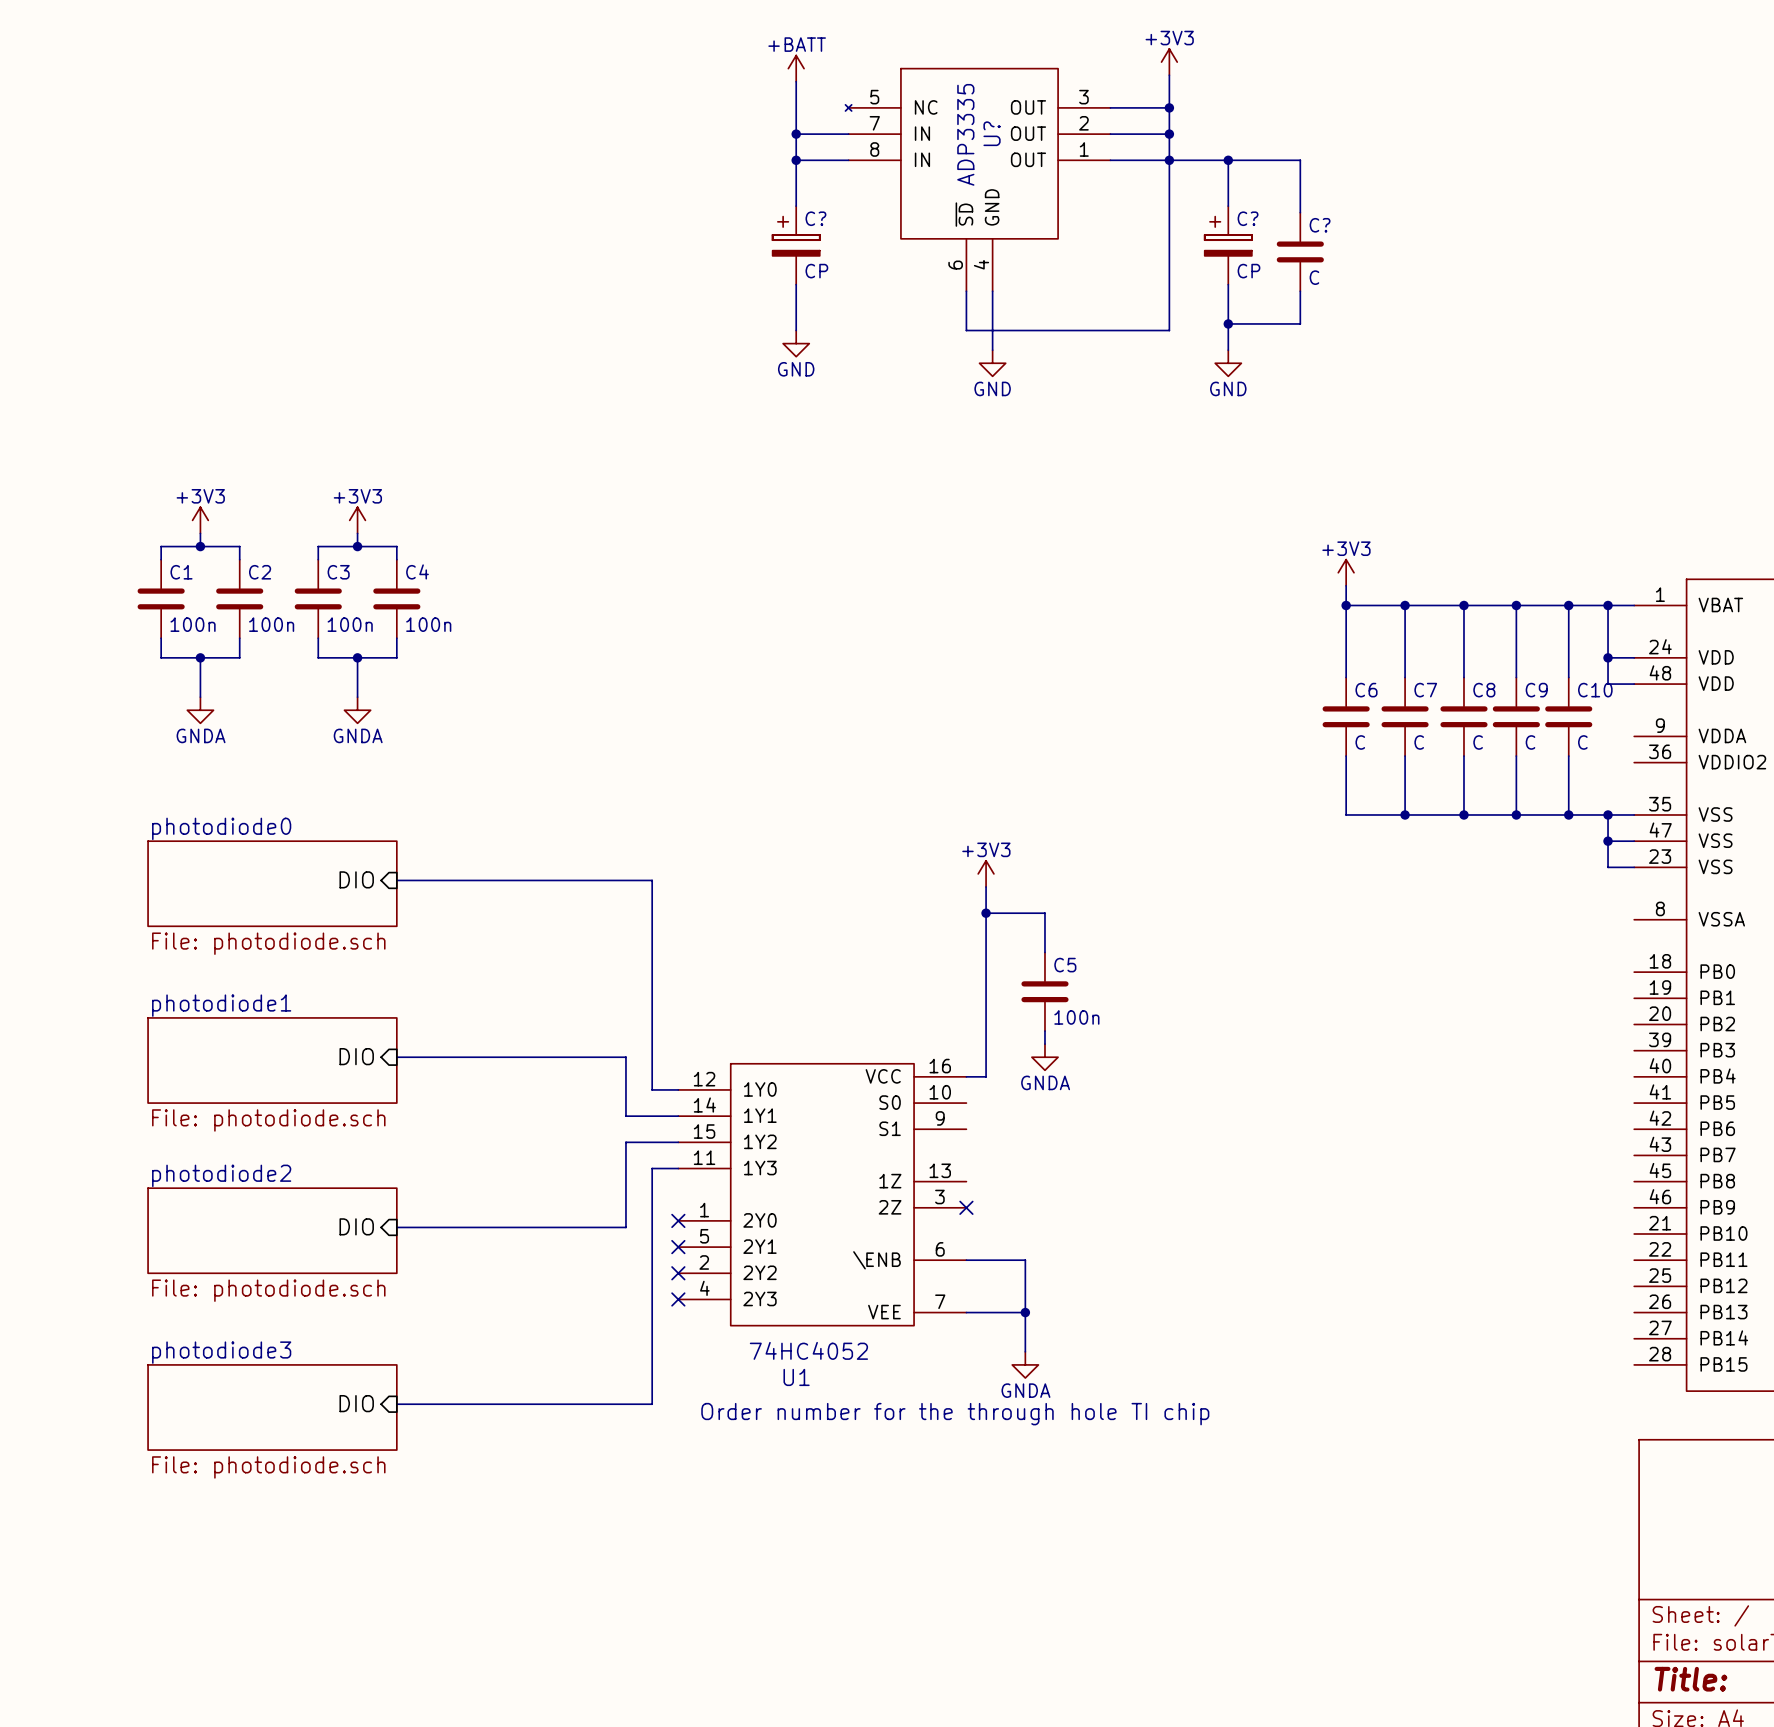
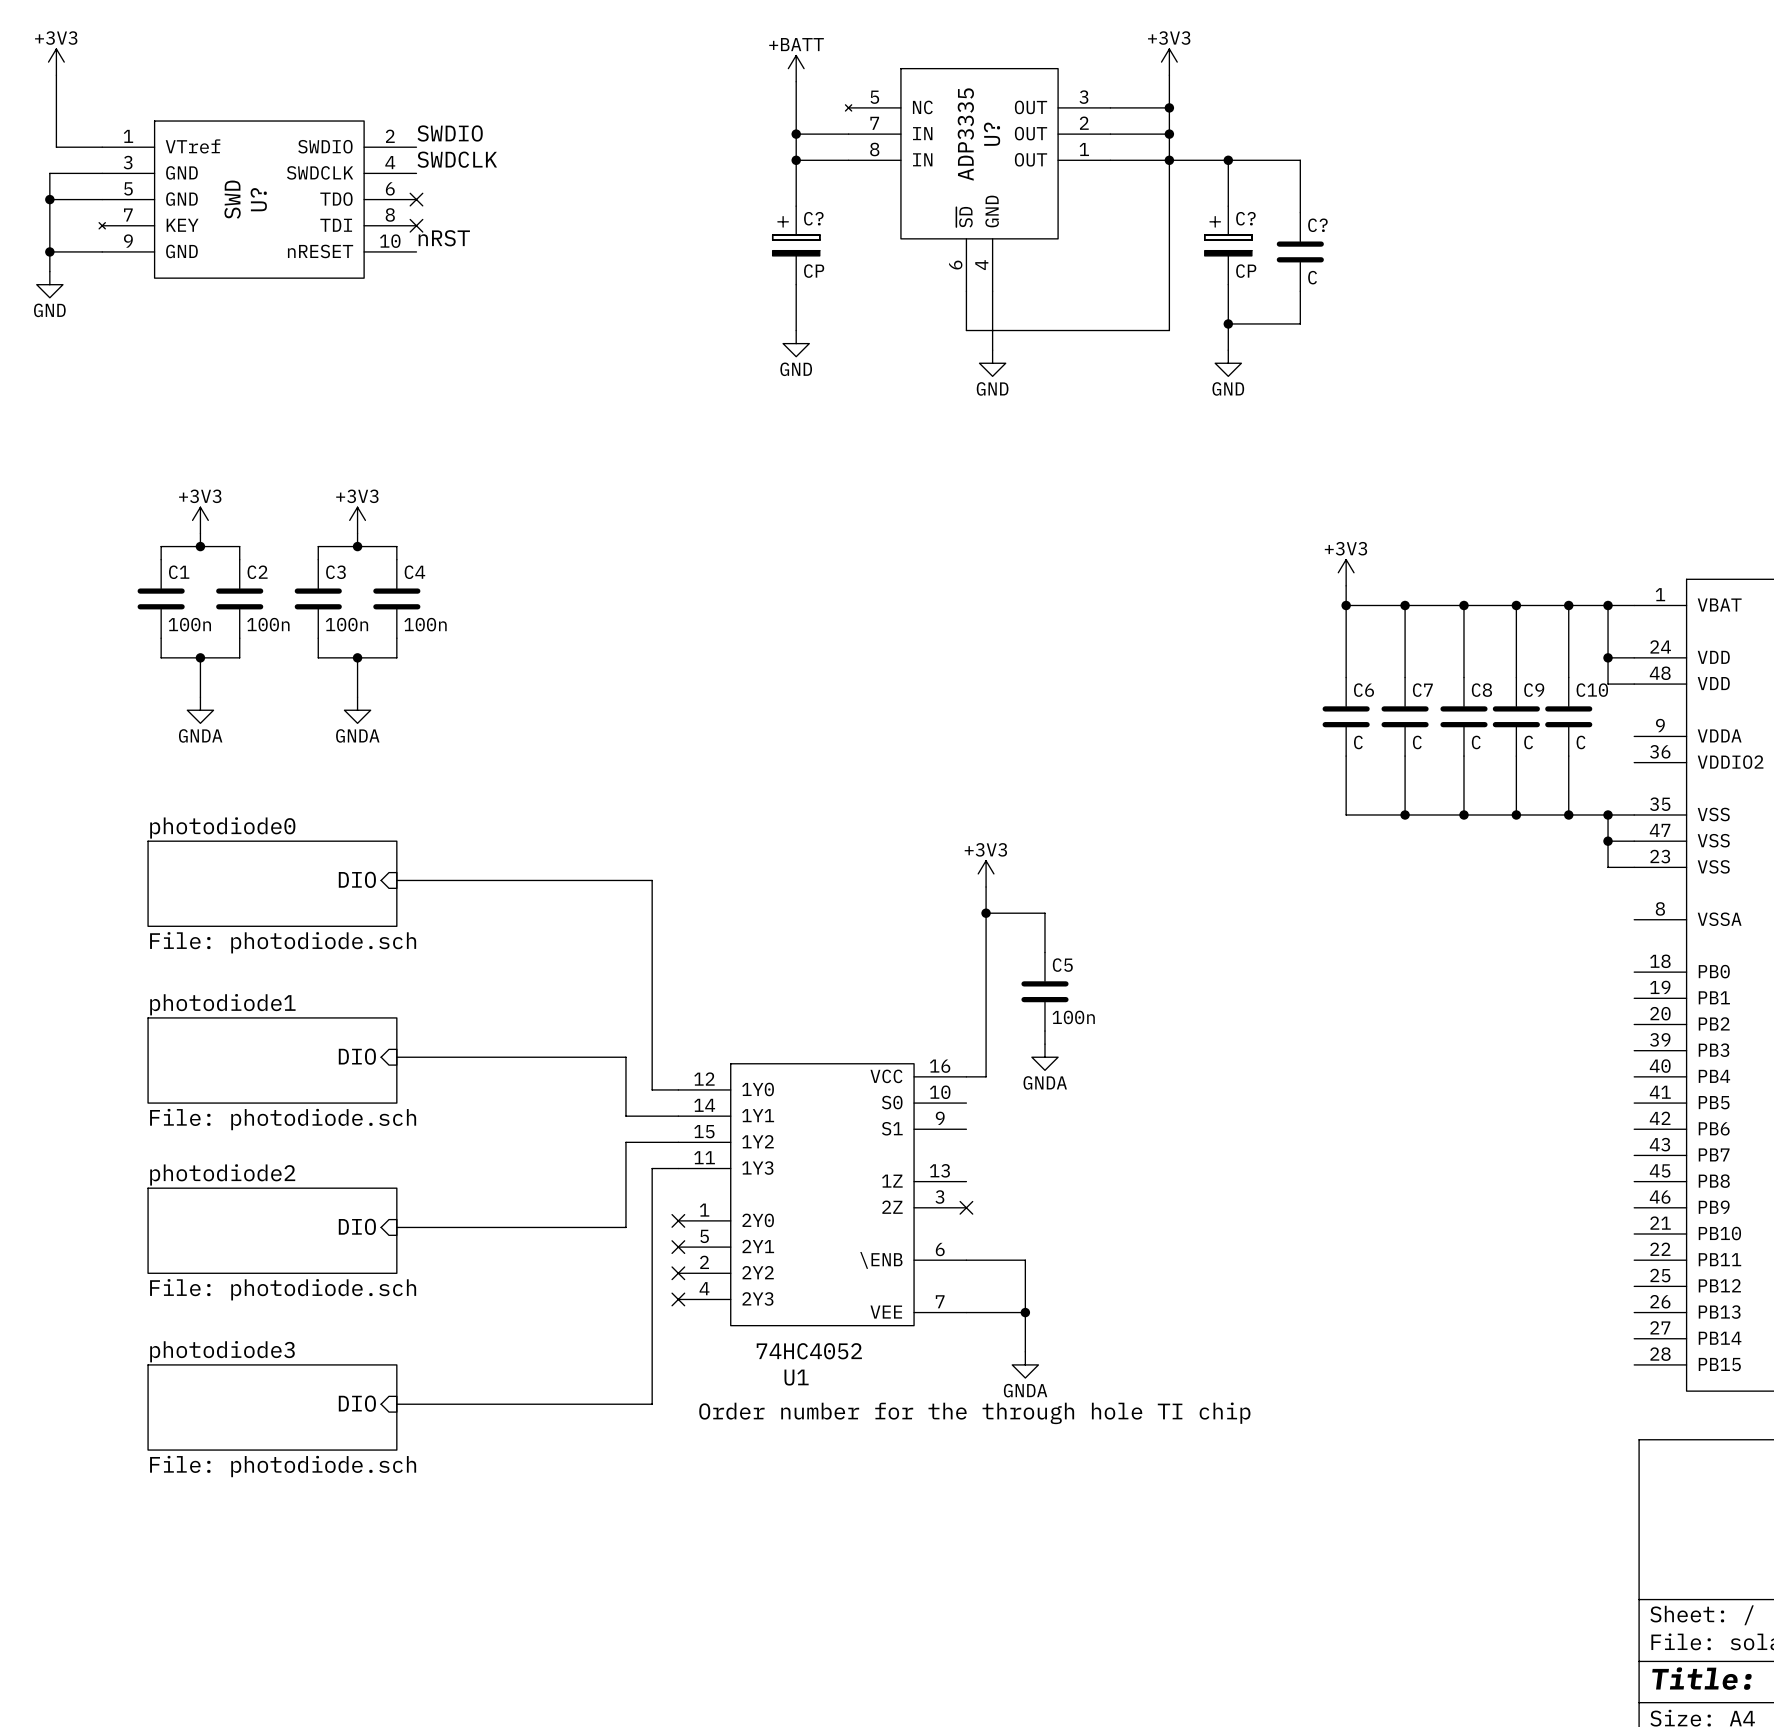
power symbol: none -> +3V3 (56, 62)
wire: none -> (56, 75) (56, 147) (102, 147)
label: none -> SWDIO (450, 133)
label: none -> SWDCLK (457, 159)
wire: none -> (102, 173) (49, 173) (49, 271)
wire: none -> (49, 199) (102, 199)
junction: none -> (49, 199)
U?: none -> SWD (257, 199)
no-connect mark: none -> (416, 199)
no-connect mark: none -> (416, 225)
label: none -> nRST (444, 238)
wire: none -> (49, 251) (102, 251)
junction: none -> (49, 251)
power symbol: none -> GND (49, 284)

